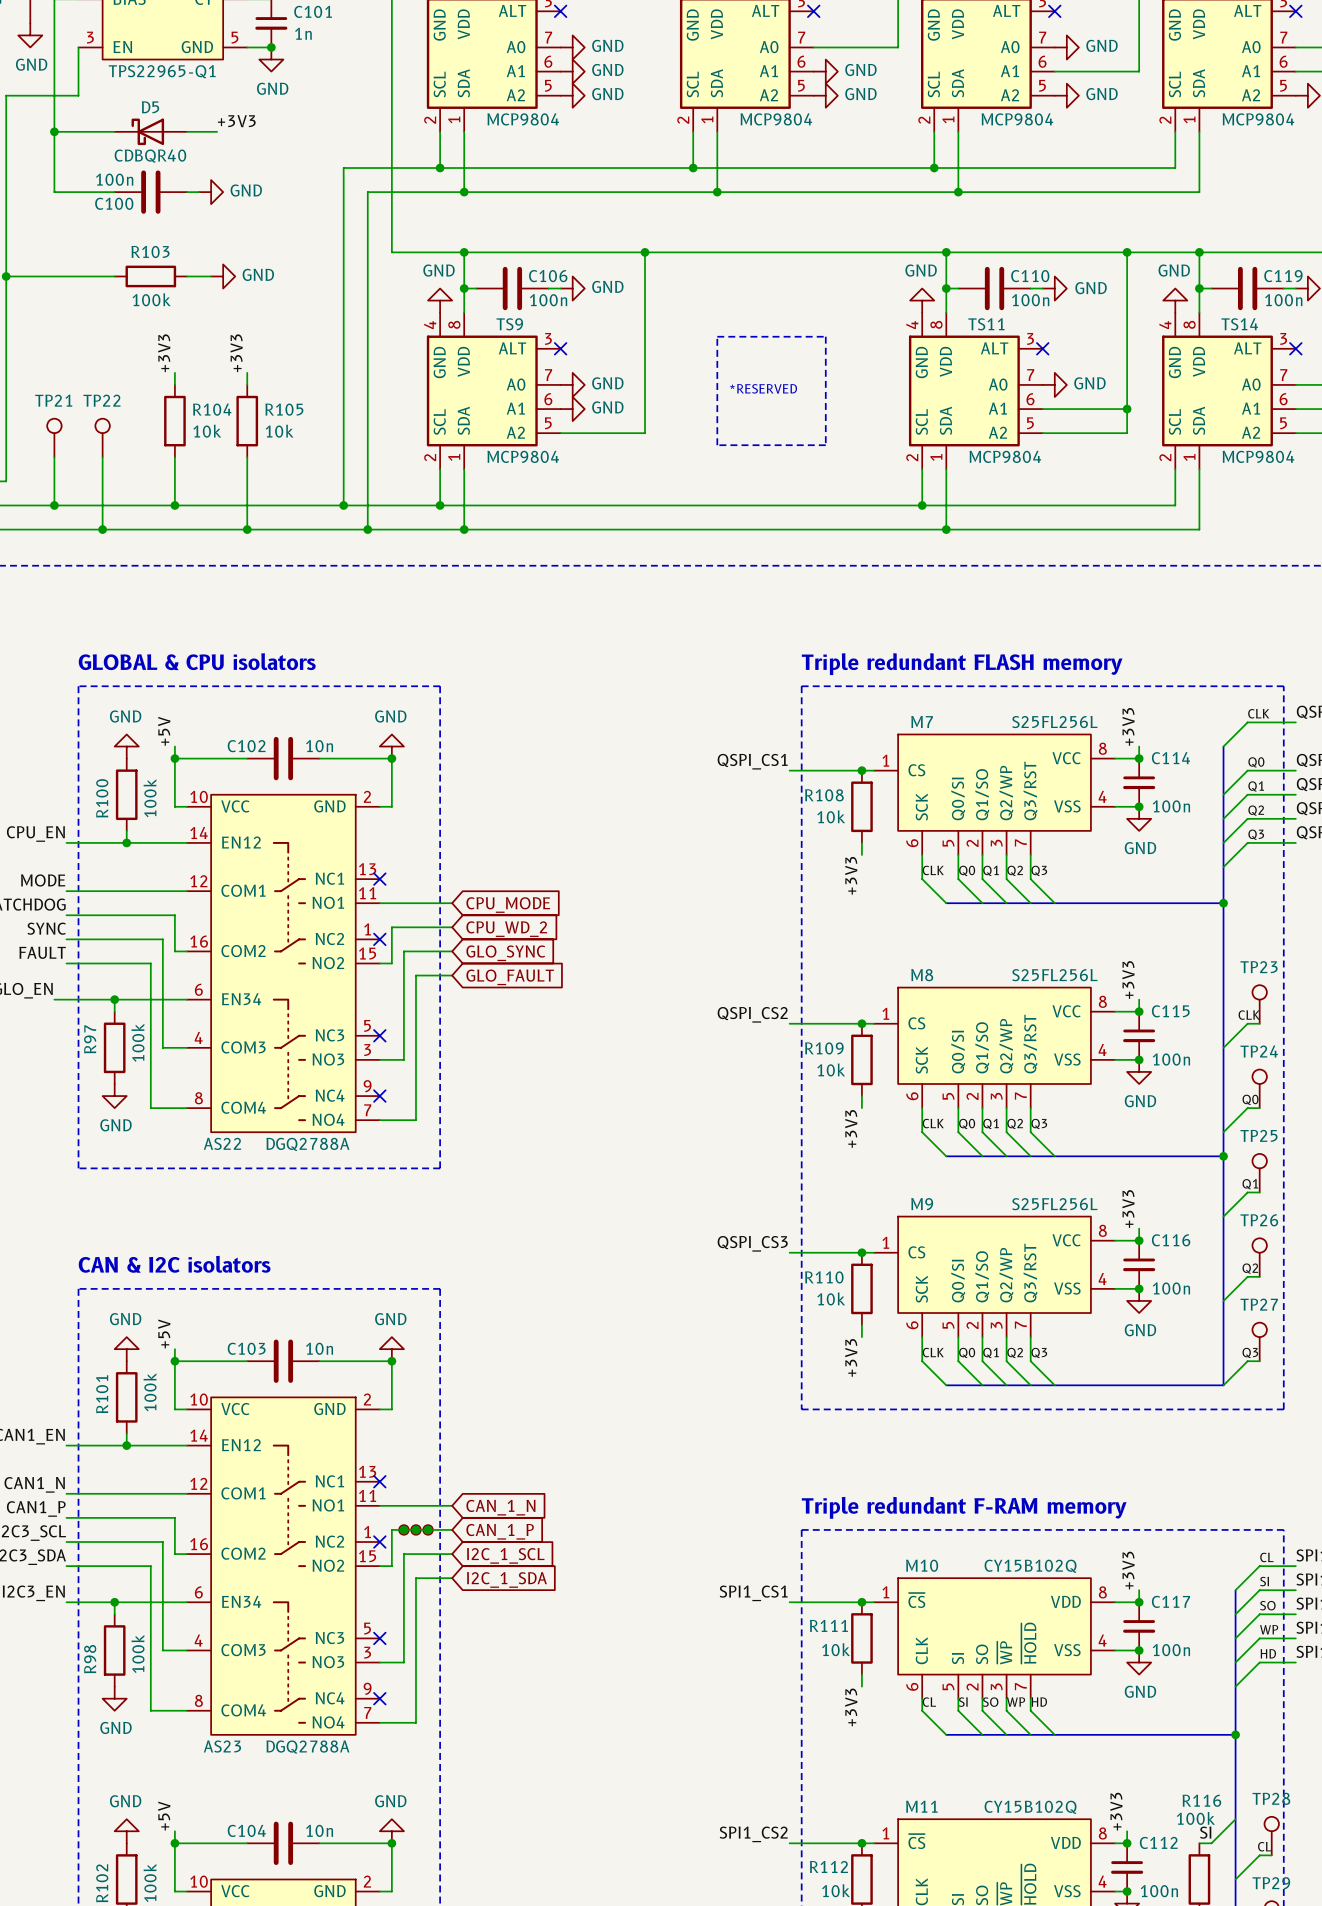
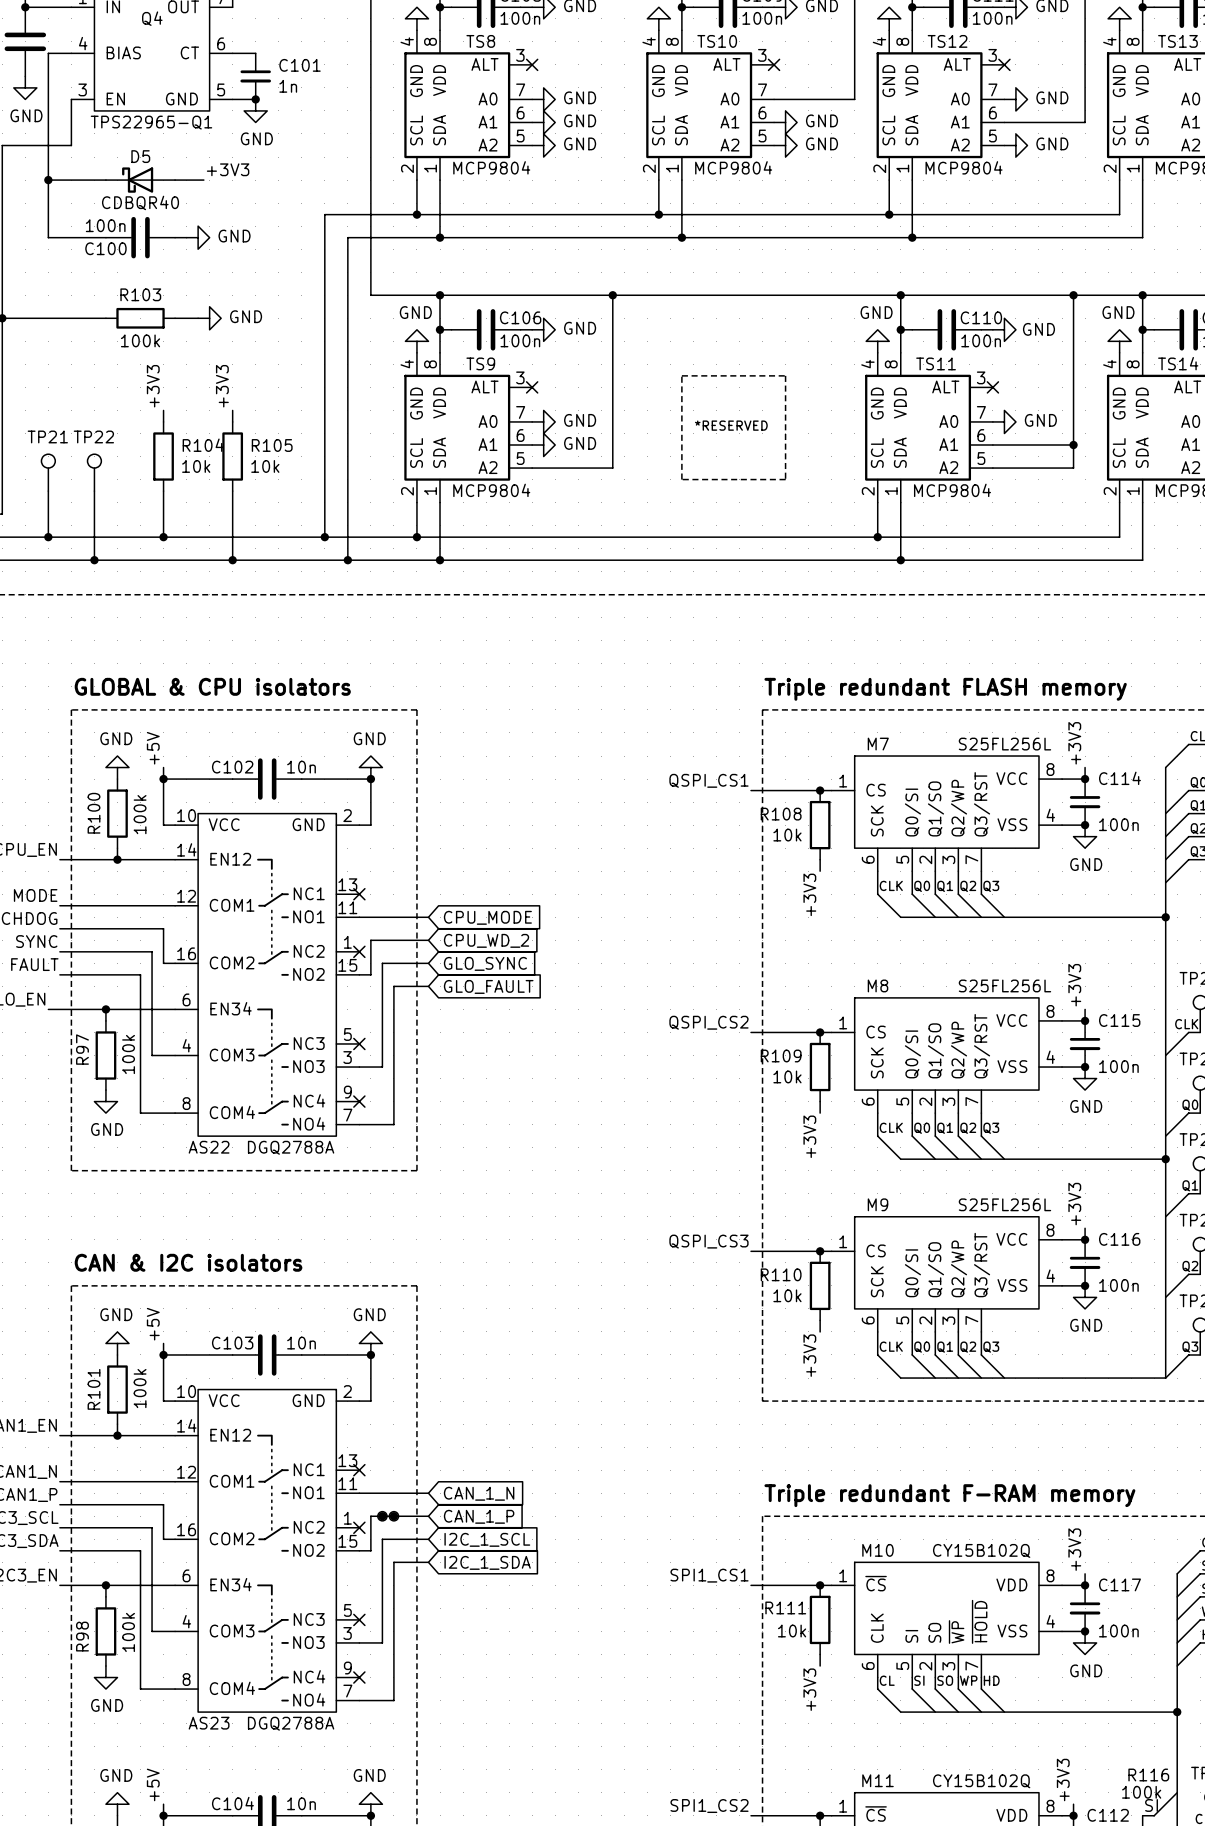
part: (428, 1529) -> none
junction: (428, 1529) -> none

